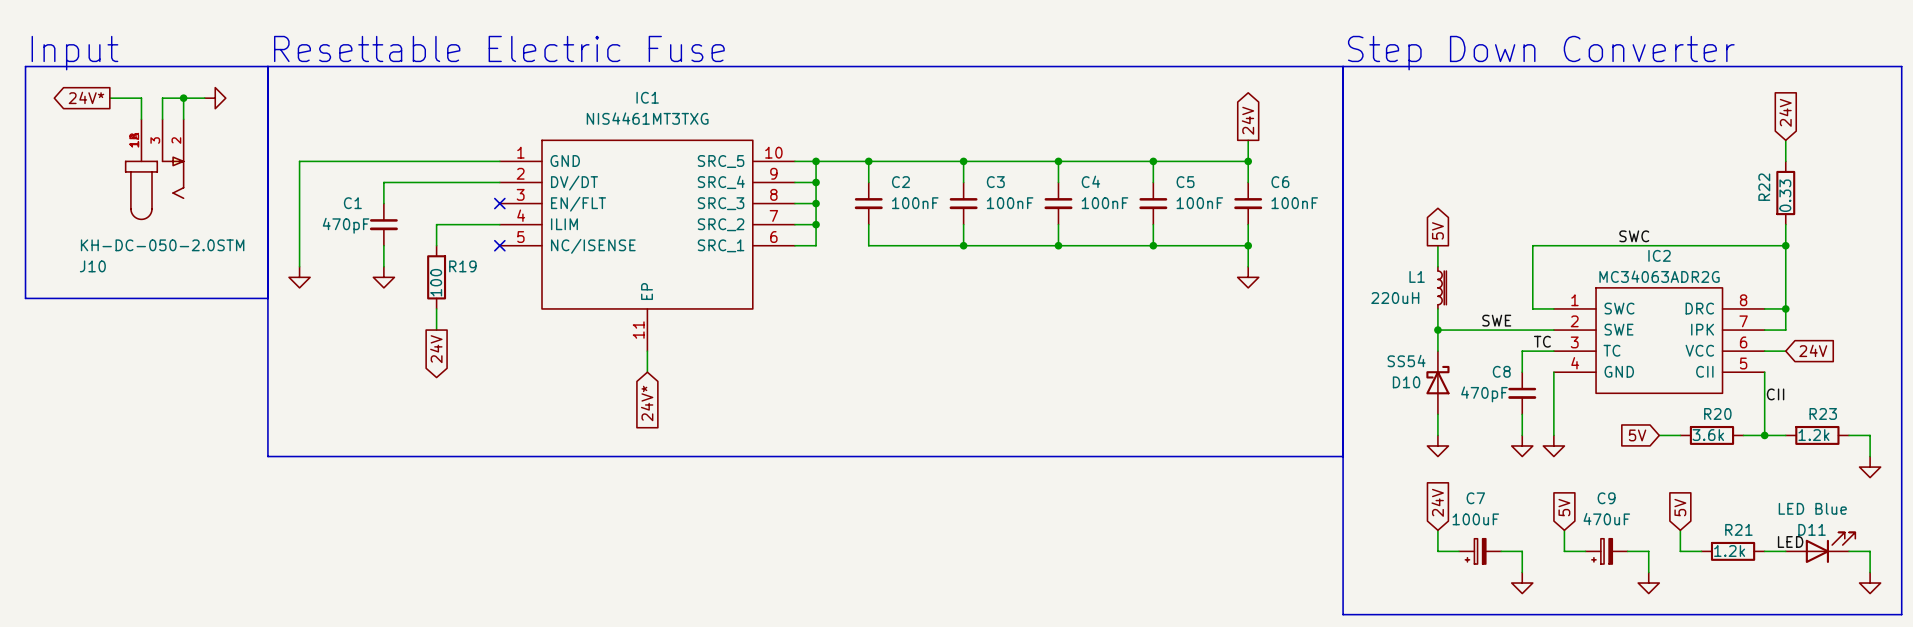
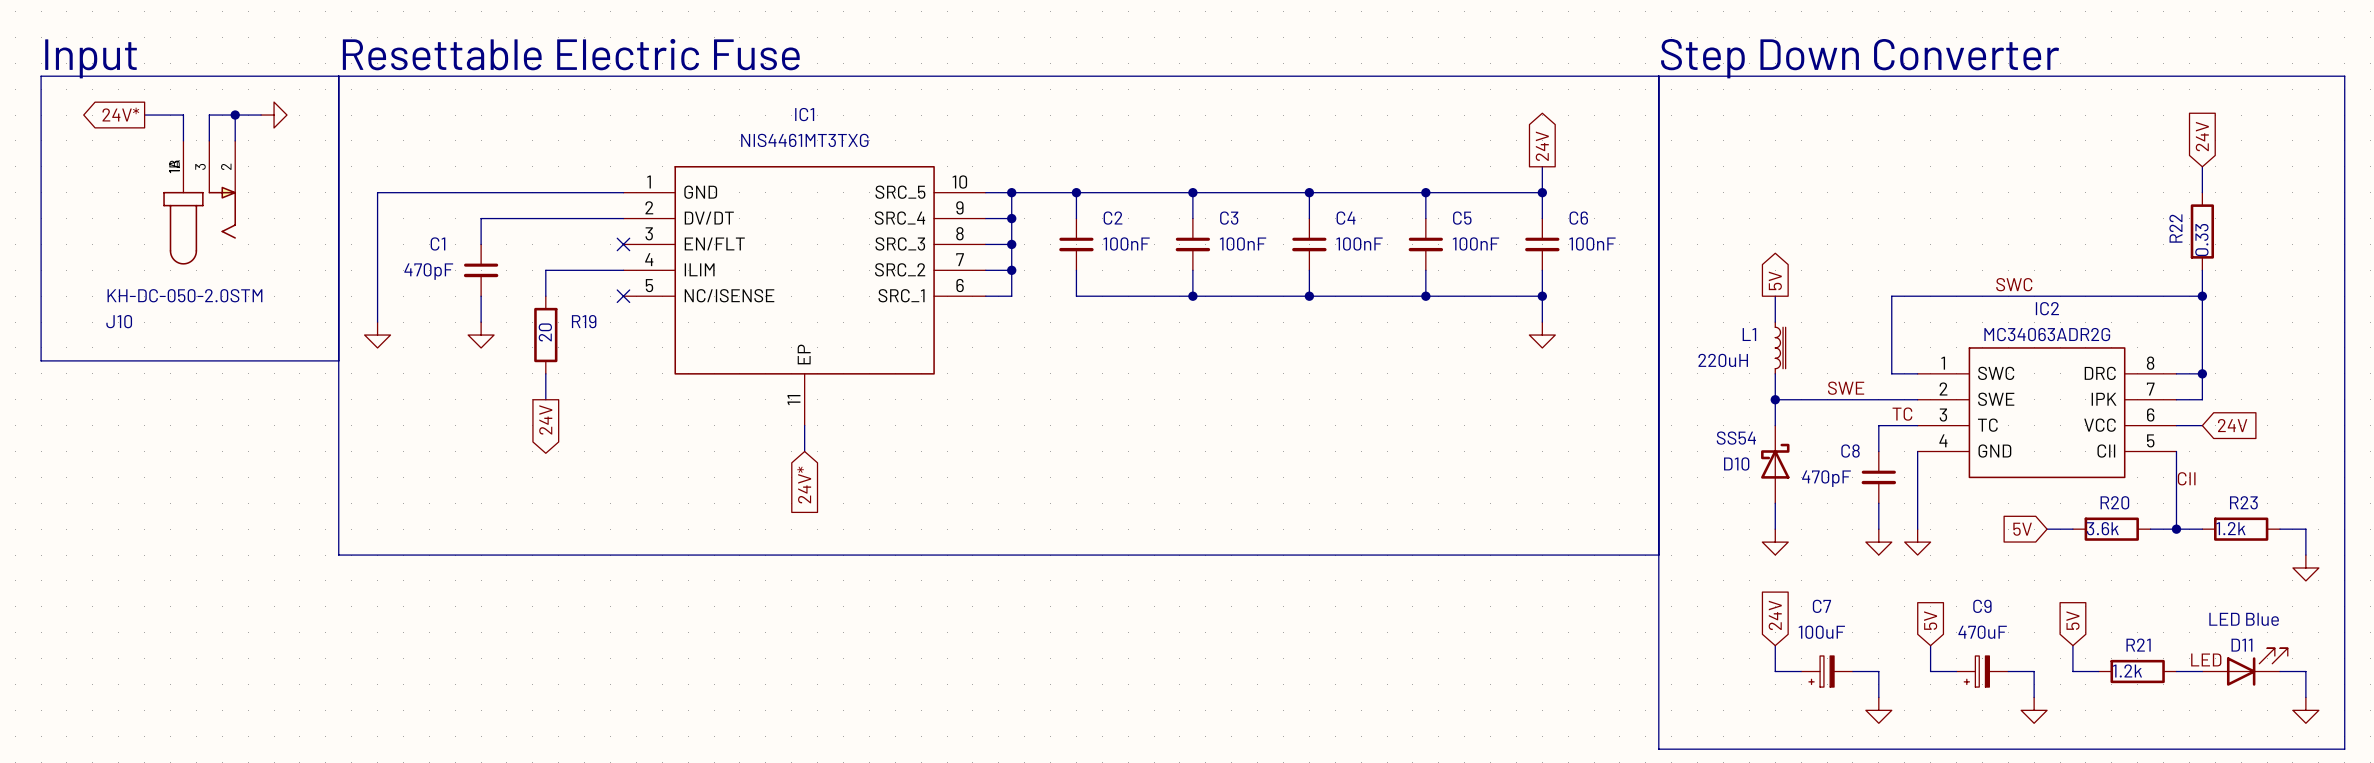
R19 value: 100 (436, 282) -> 20 (545, 332)

